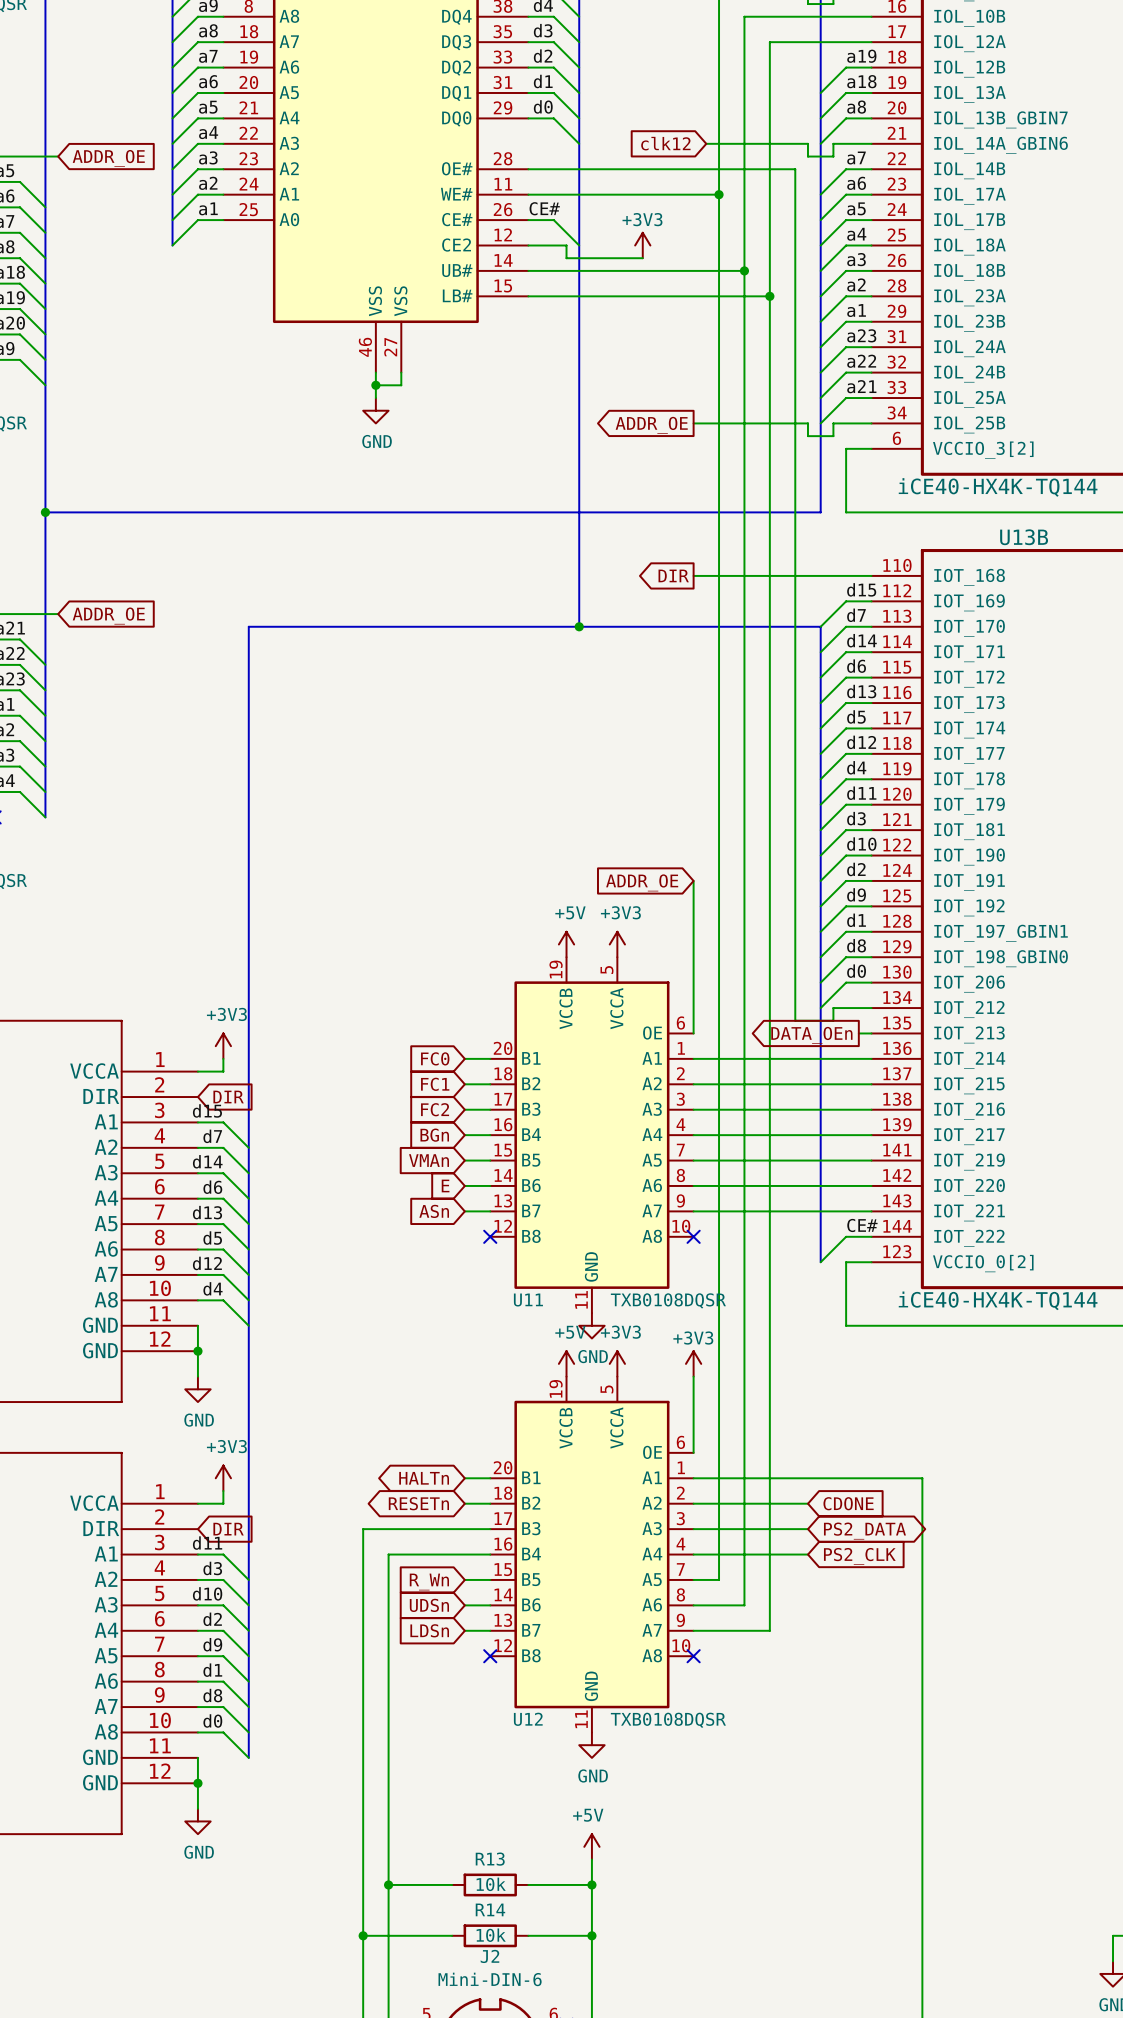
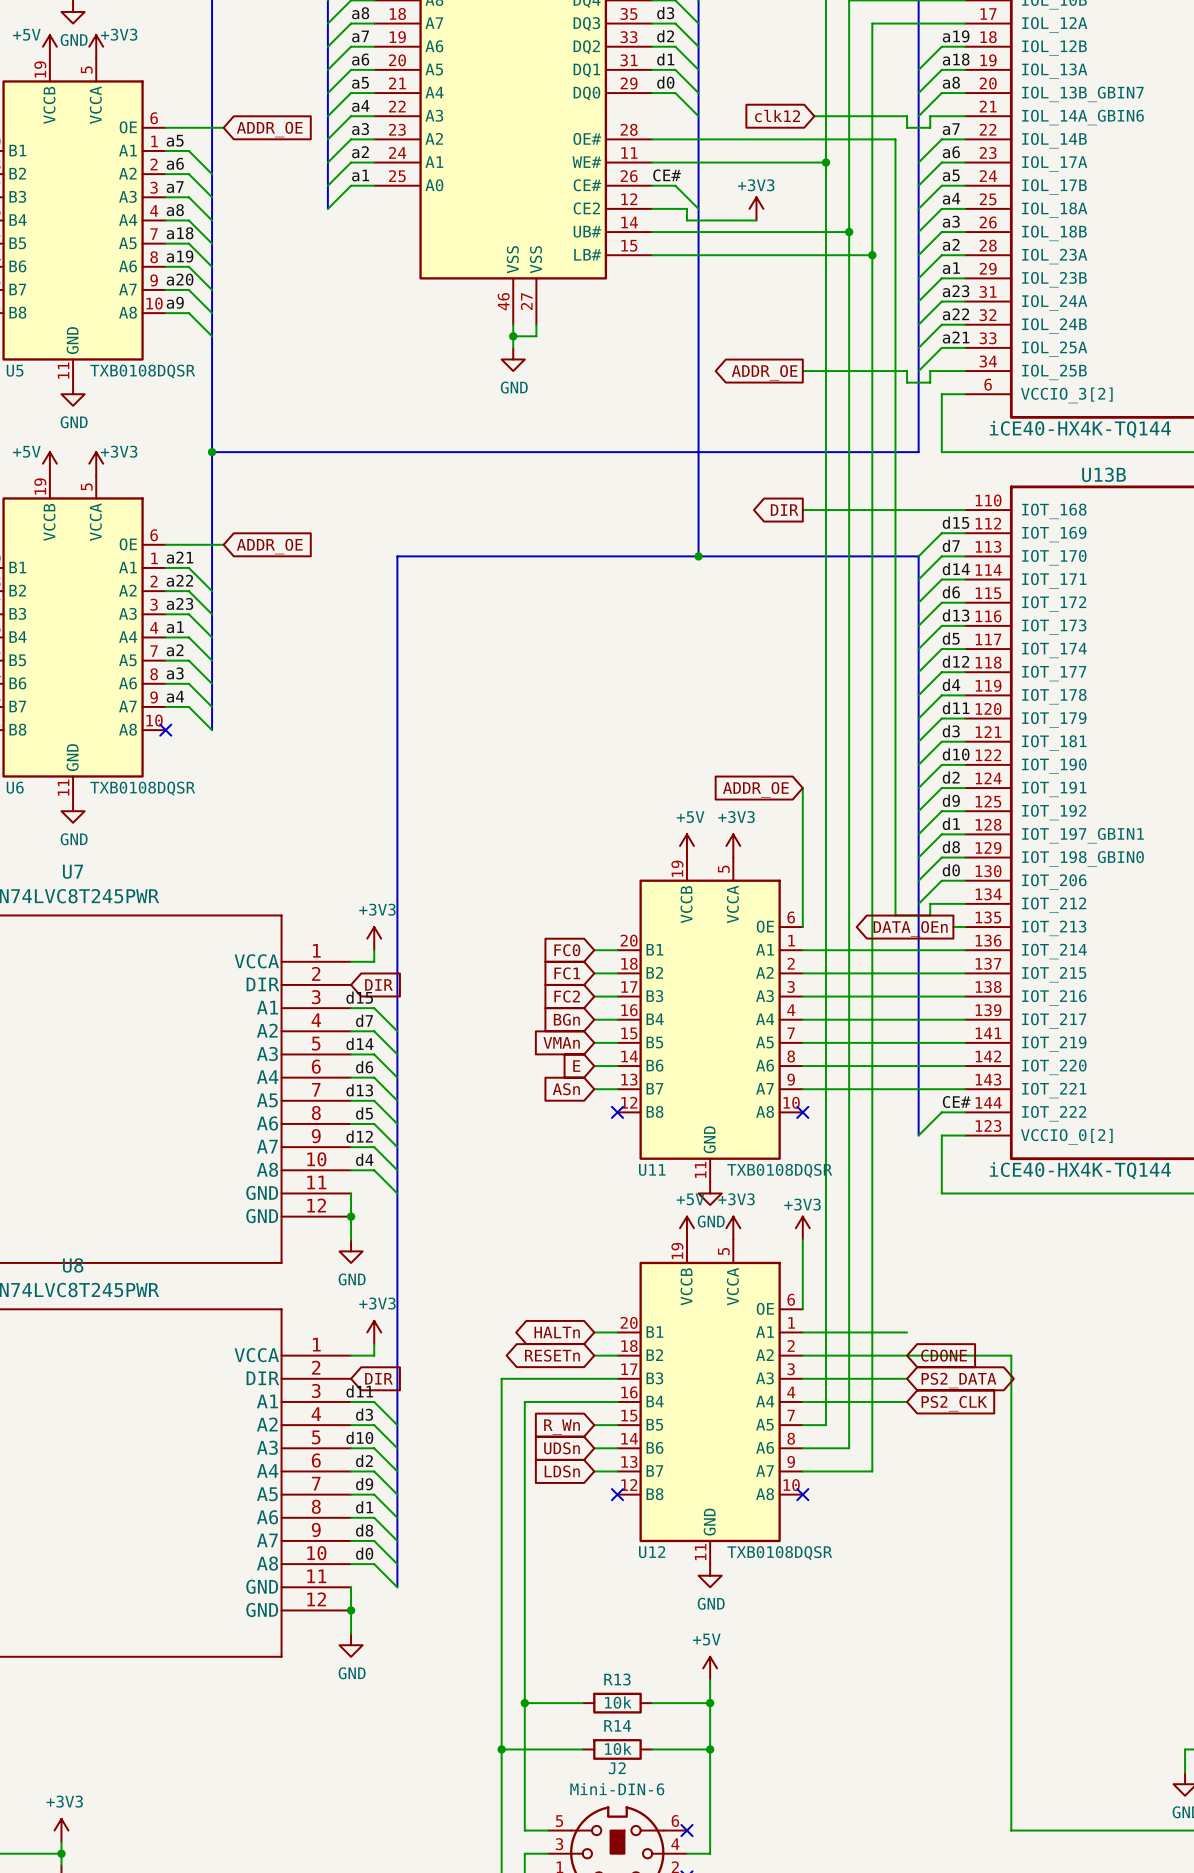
wire: (807, 1478) (922, 1478) (922, 1503) -> (907, 1355) (1011, 1355)

